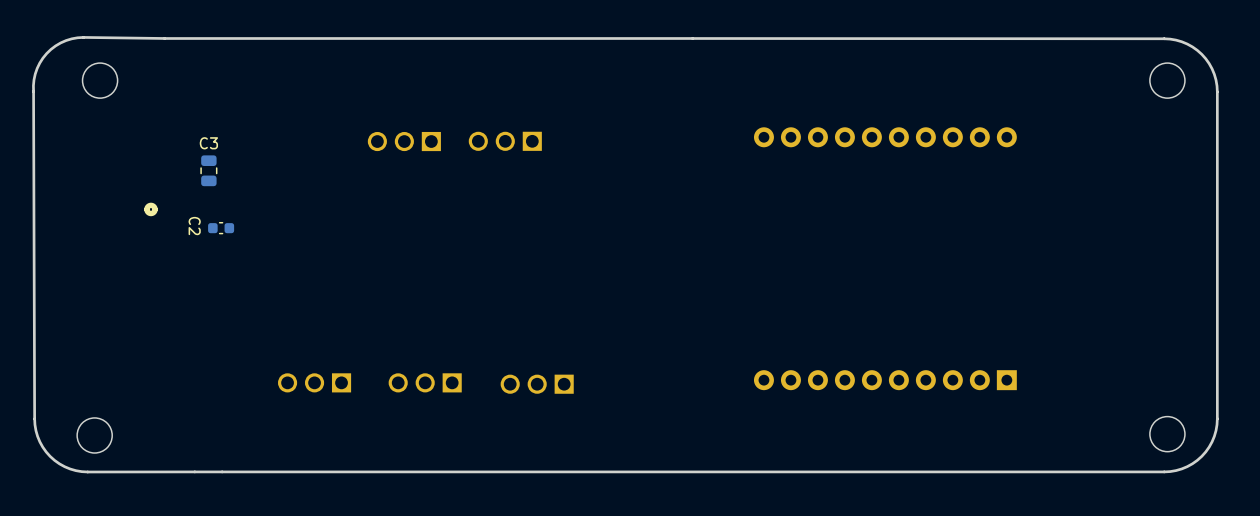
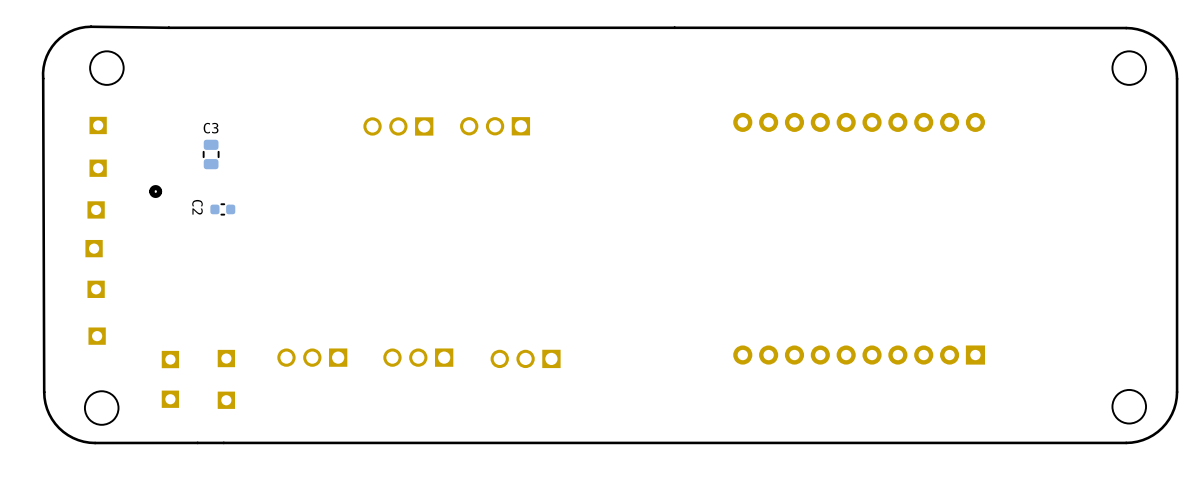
part: none -> (98, 125)
part: none -> (98, 168)
part: none -> (96, 209)
part: none -> (94, 248)
part: none -> (96, 289)
part: none -> (97, 336)
part: none -> (226, 358)
part: none -> (170, 359)
part: none -> (170, 399)
part: none -> (226, 400)

